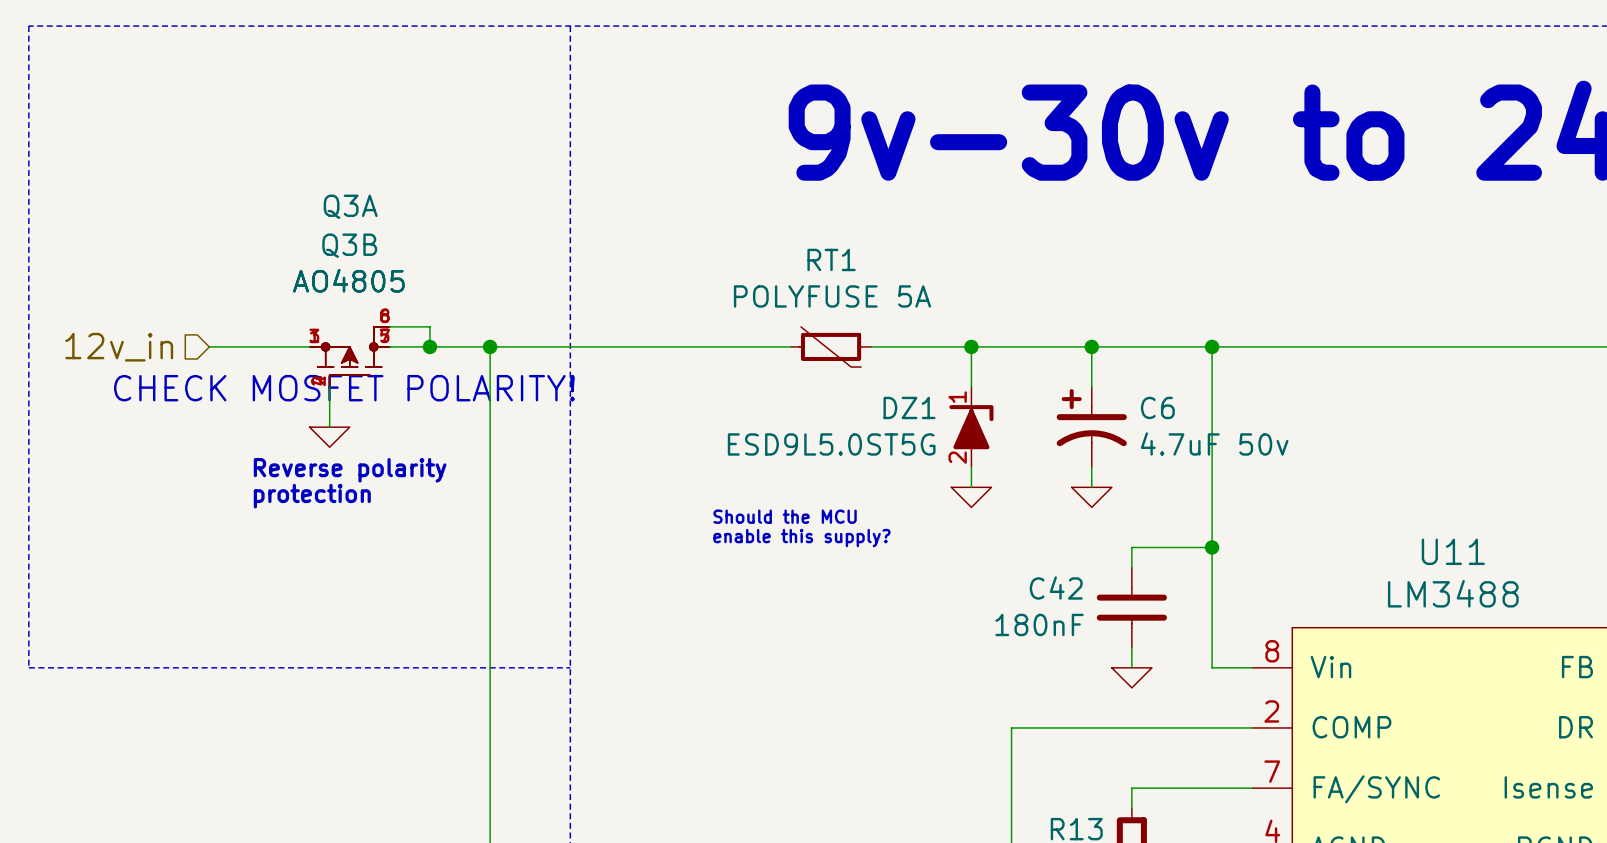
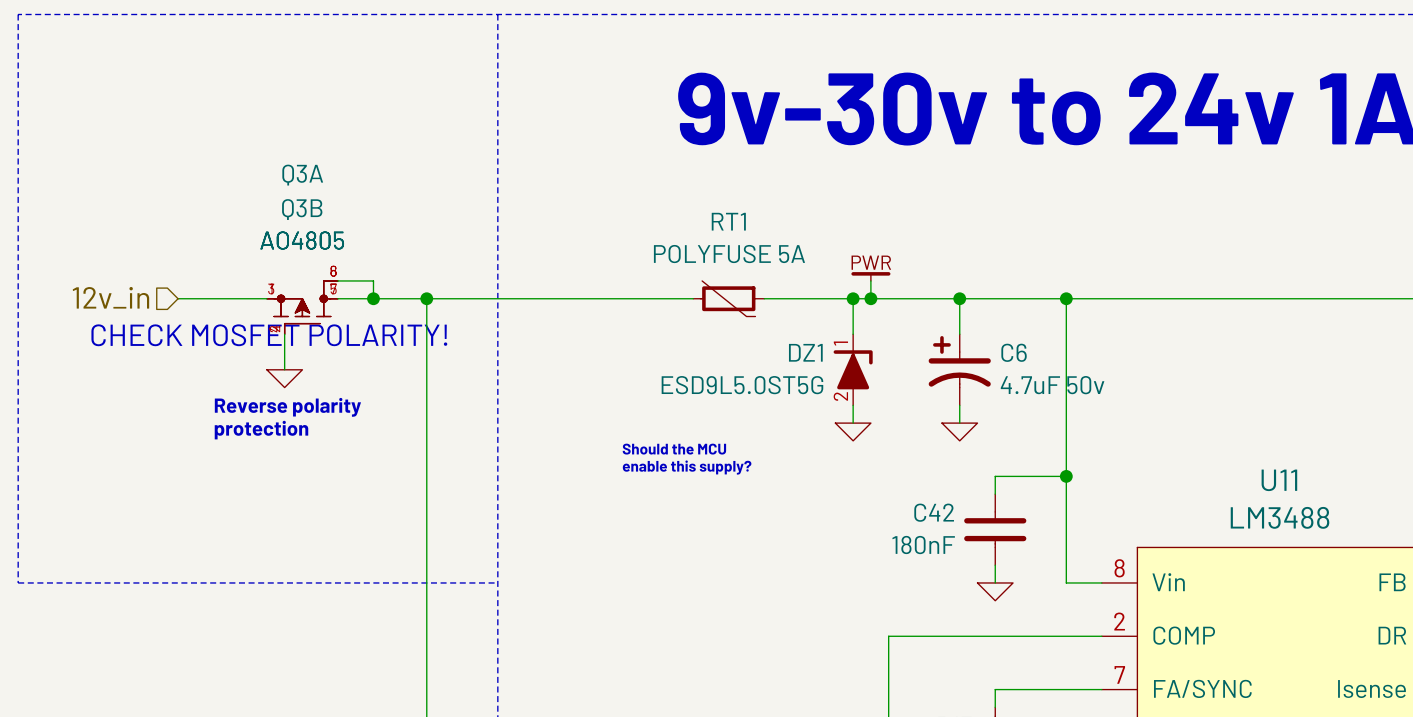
power symbol: none -> (870, 276)
wire: none -> (870, 280) (870, 298)
junction: none -> (870, 298)

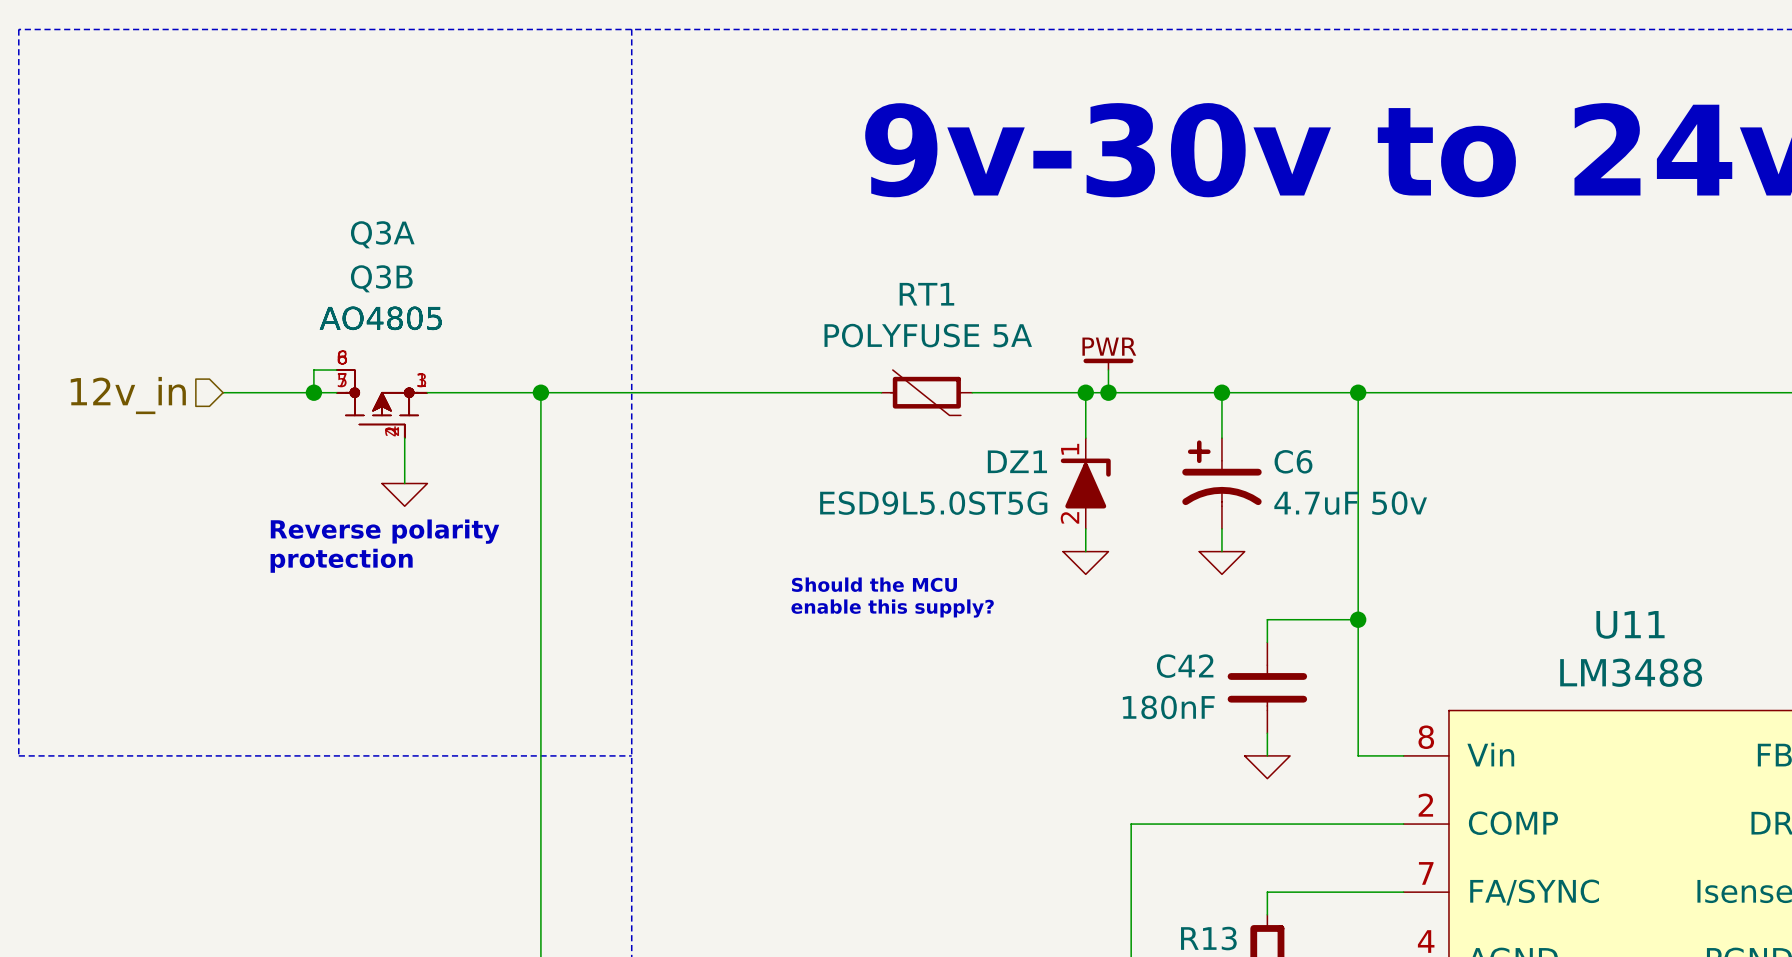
wire: none -> (336, 370) (313, 370) (313, 392)
wire: (337, 280) (373, 280) (373, 298) -> none
junction: none -> (313, 392)
junction: (373, 298) -> none
Q3A flip: as is (302, 302) -> left-right (382, 397)
Q3B flip: as is (302, 302) -> left-right (382, 397)
wire: (284, 334) (284, 369) -> (404, 438) (404, 483)
text: CHECK MOSFET POLARITY! (269, 335) -> none
power symbol position: (284, 378) -> (404, 494)

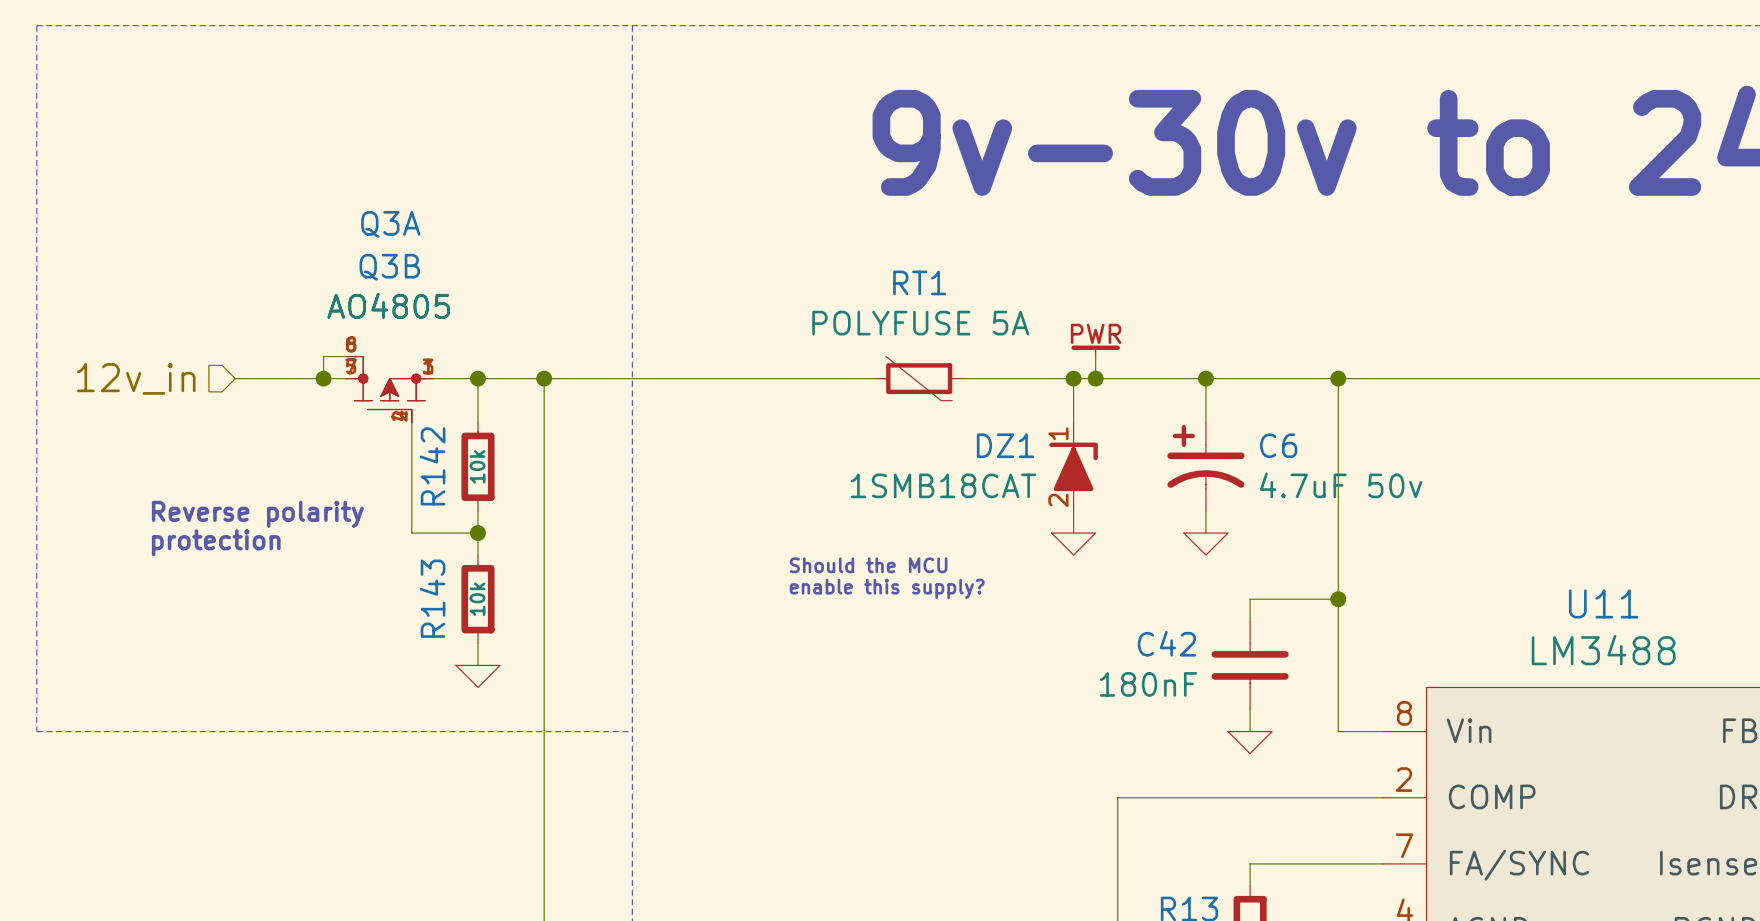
wire: none -> (477, 378) (477, 422)
junction: none -> (477, 378)
wire: none -> (411, 466) (411, 533) (477, 533)
R142: none -> 10k (477, 466)
power symbol position: (404, 494) -> (477, 676)
DZ1 value: ESD9L5.0ST5G (933, 503) -> 1SMB18CAT (943, 485)
wire: none -> (477, 510) (477, 555)
text position: Reverse polarity (385, 531) -> Reverse polarity (257, 514)
junction: none -> (477, 533)
text position: protection (341, 560) -> protection (216, 542)
R143: none -> 10k (477, 599)
wire: none -> (477, 643) (477, 665)

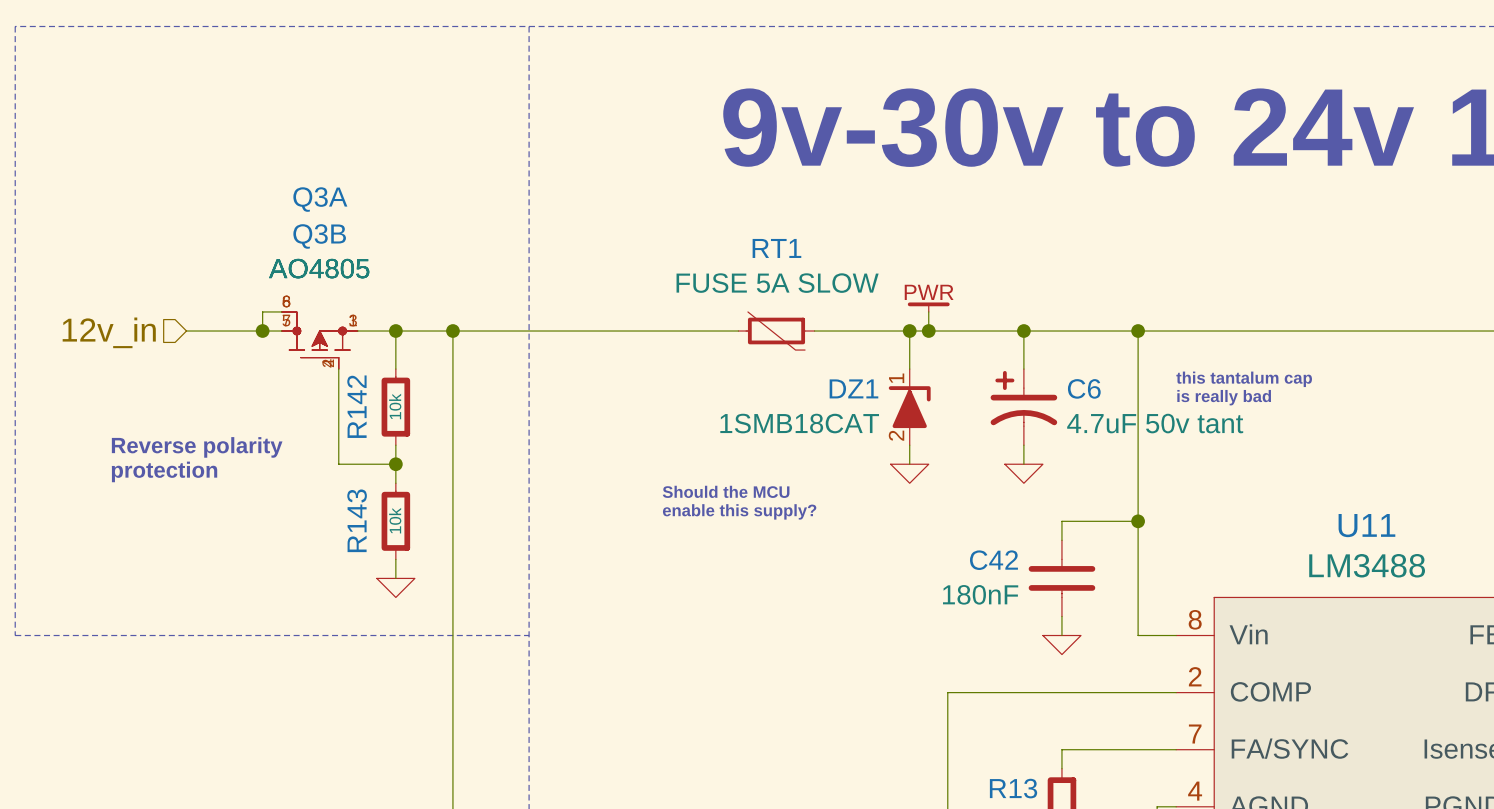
RT1 value: POLYFUSE 5A (920, 323) -> FUSE 5A SLOW (777, 283)
text: none -> this tantalum cap (1244, 379)
text: none -> is really bad (1224, 397)
C6 value: 4.7uF 50v (1341, 485) -> 4.7uF 50v tant (1155, 423)

